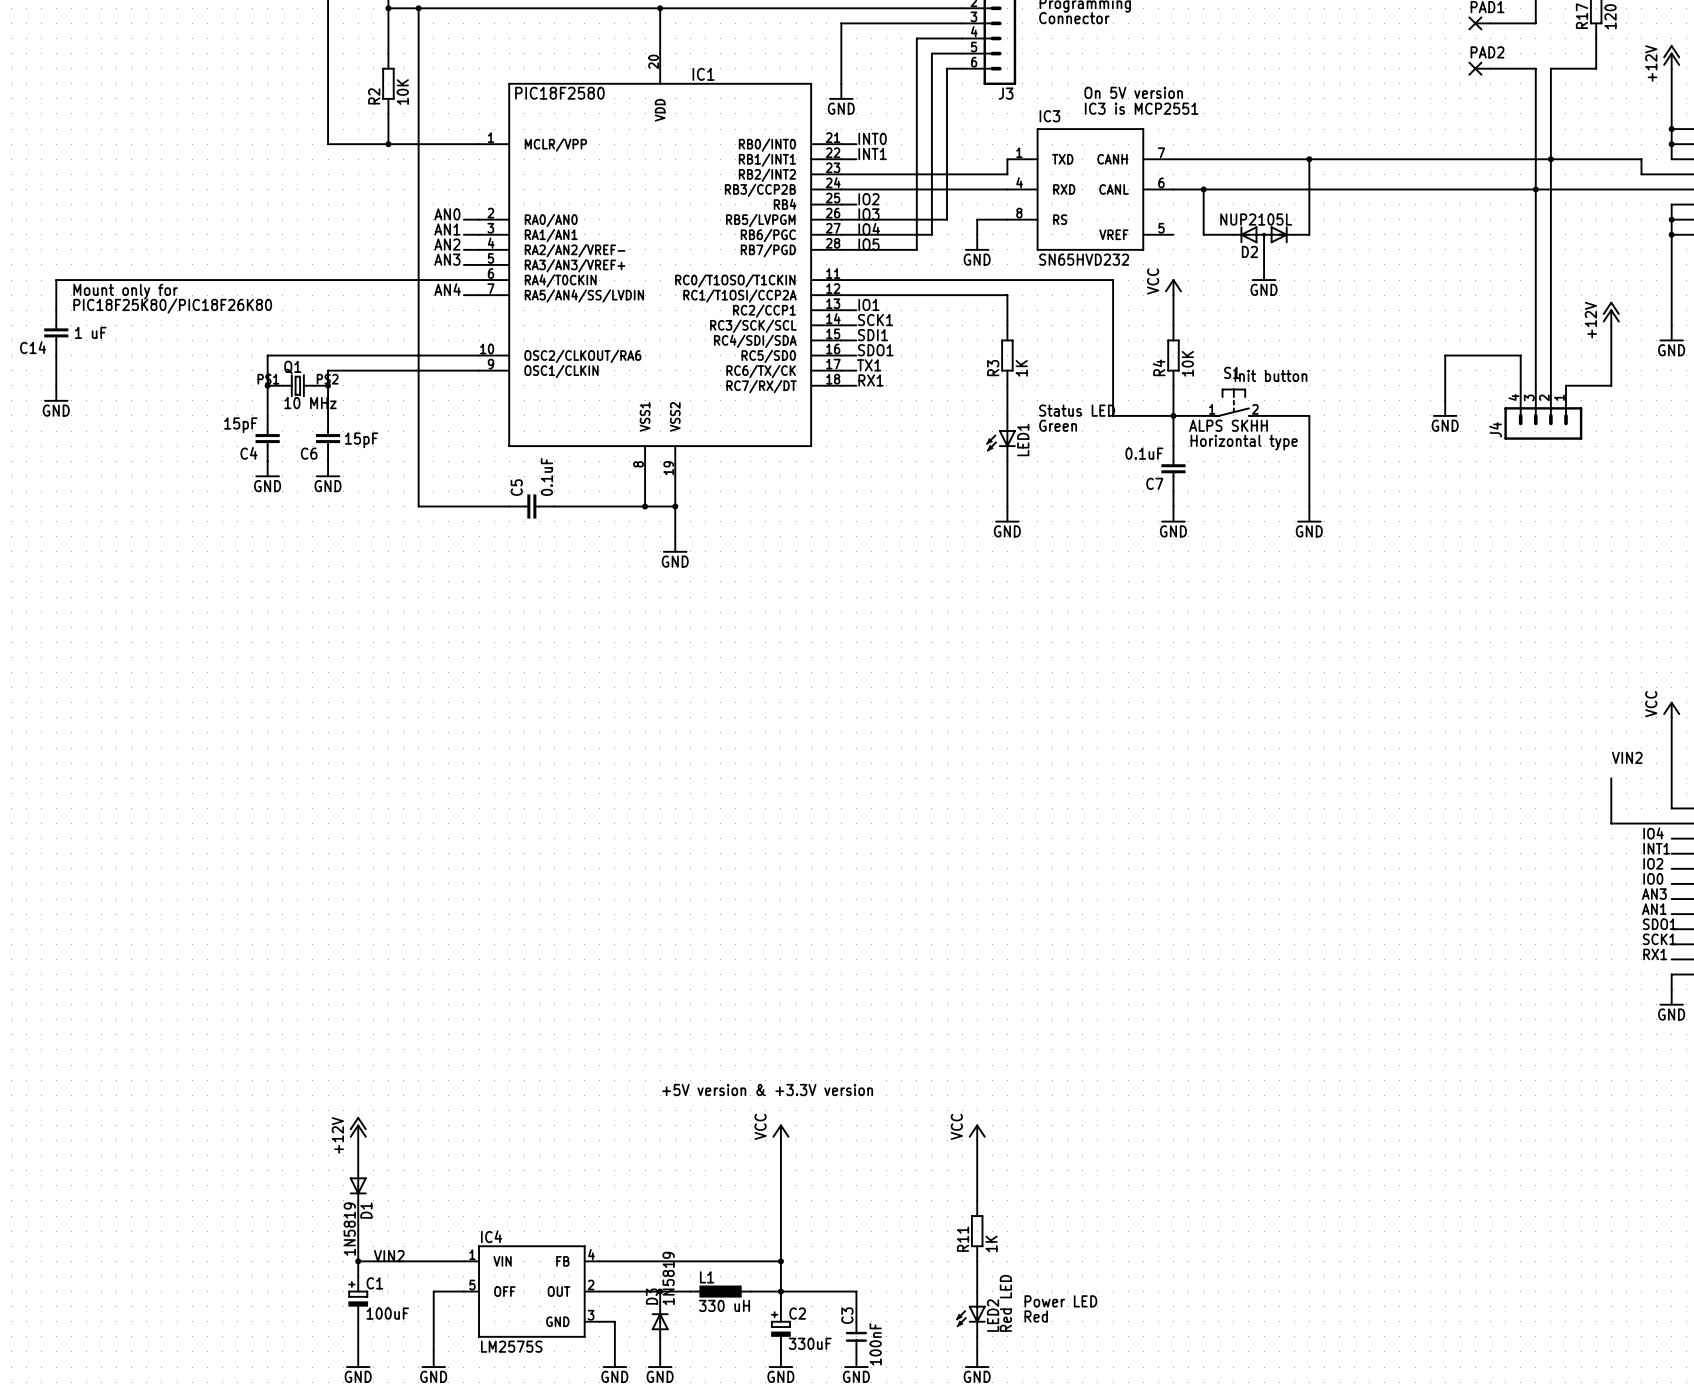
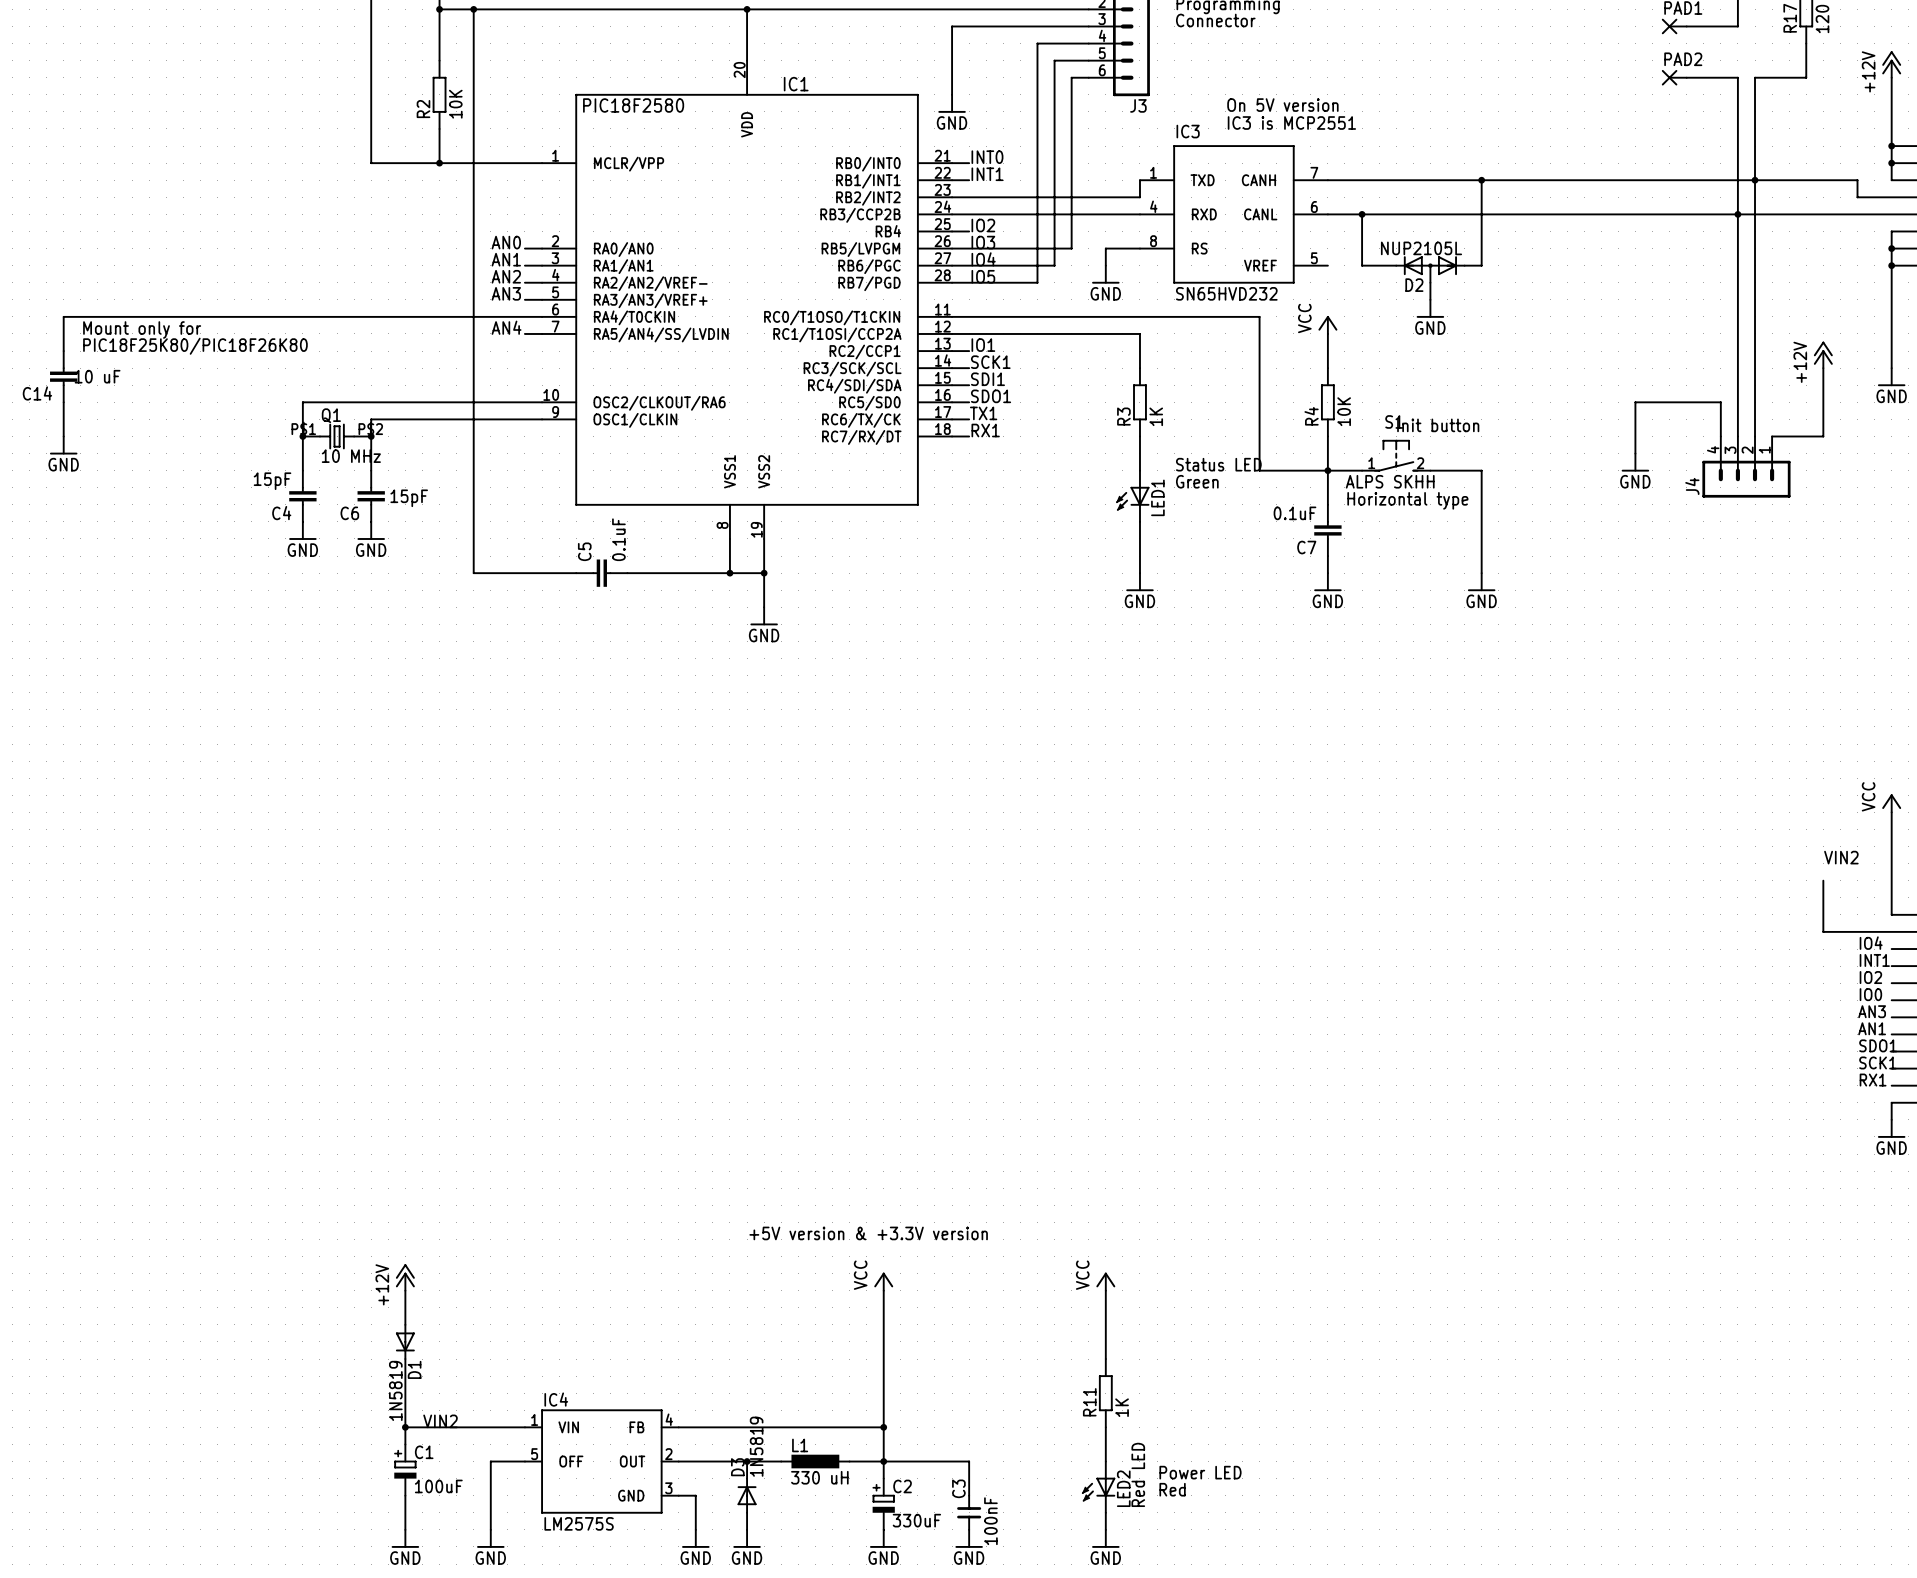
C14 value: 1 uF (90, 332) -> 10 uF (97, 376)

